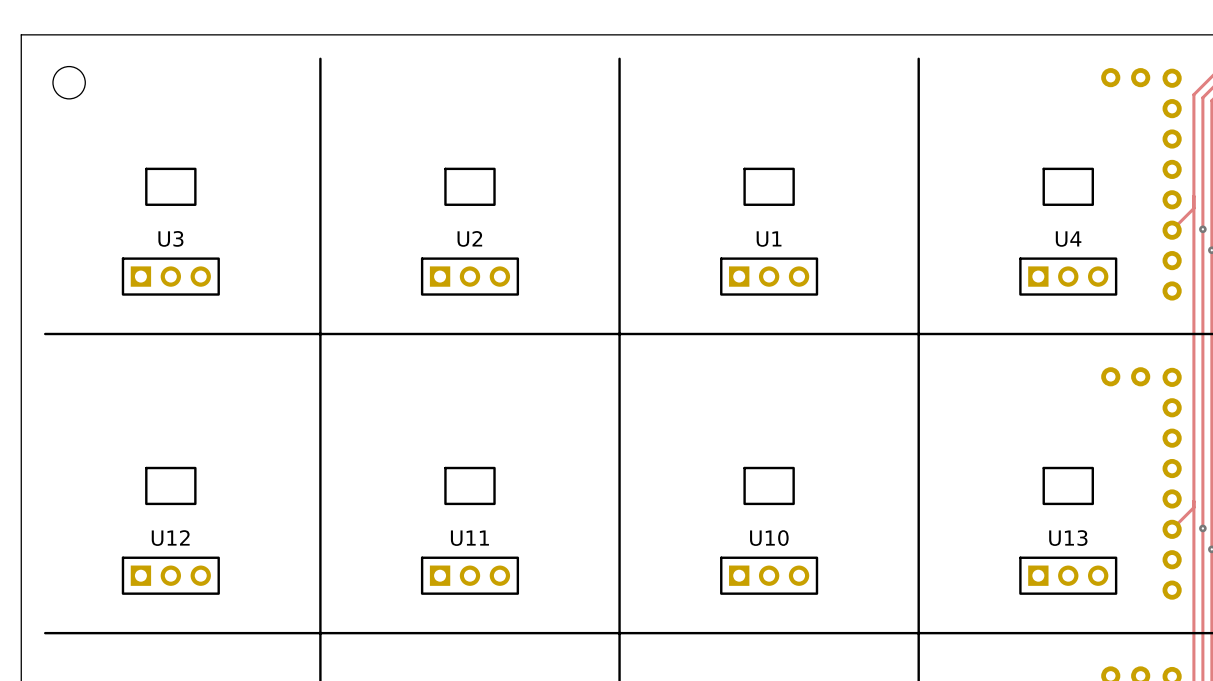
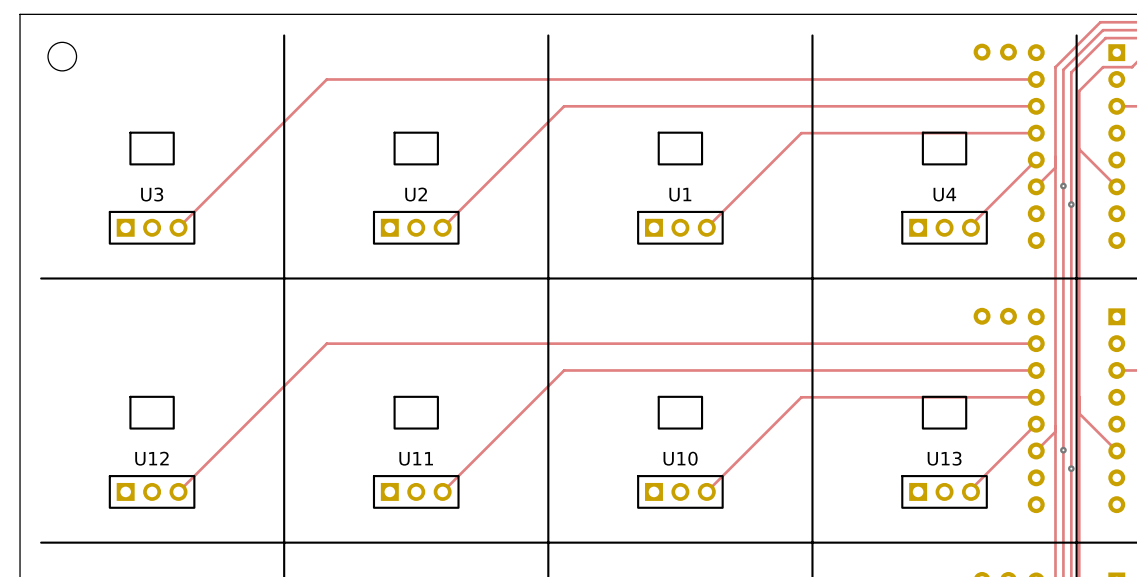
track: none -> (1036, 79) (326, 79) (178, 227)
track: none -> (1036, 106) (564, 106) (442, 227)
track: none -> (1036, 133) (801, 133) (706, 227)
track: none -> (1036, 160) (970, 225) (970, 227)
track: none -> (1036, 343) (326, 343) (178, 491)
track: none -> (1036, 370) (564, 370) (442, 491)
track: none -> (1036, 397) (801, 397) (706, 491)
track: none -> (1036, 424) (970, 489) (970, 491)

